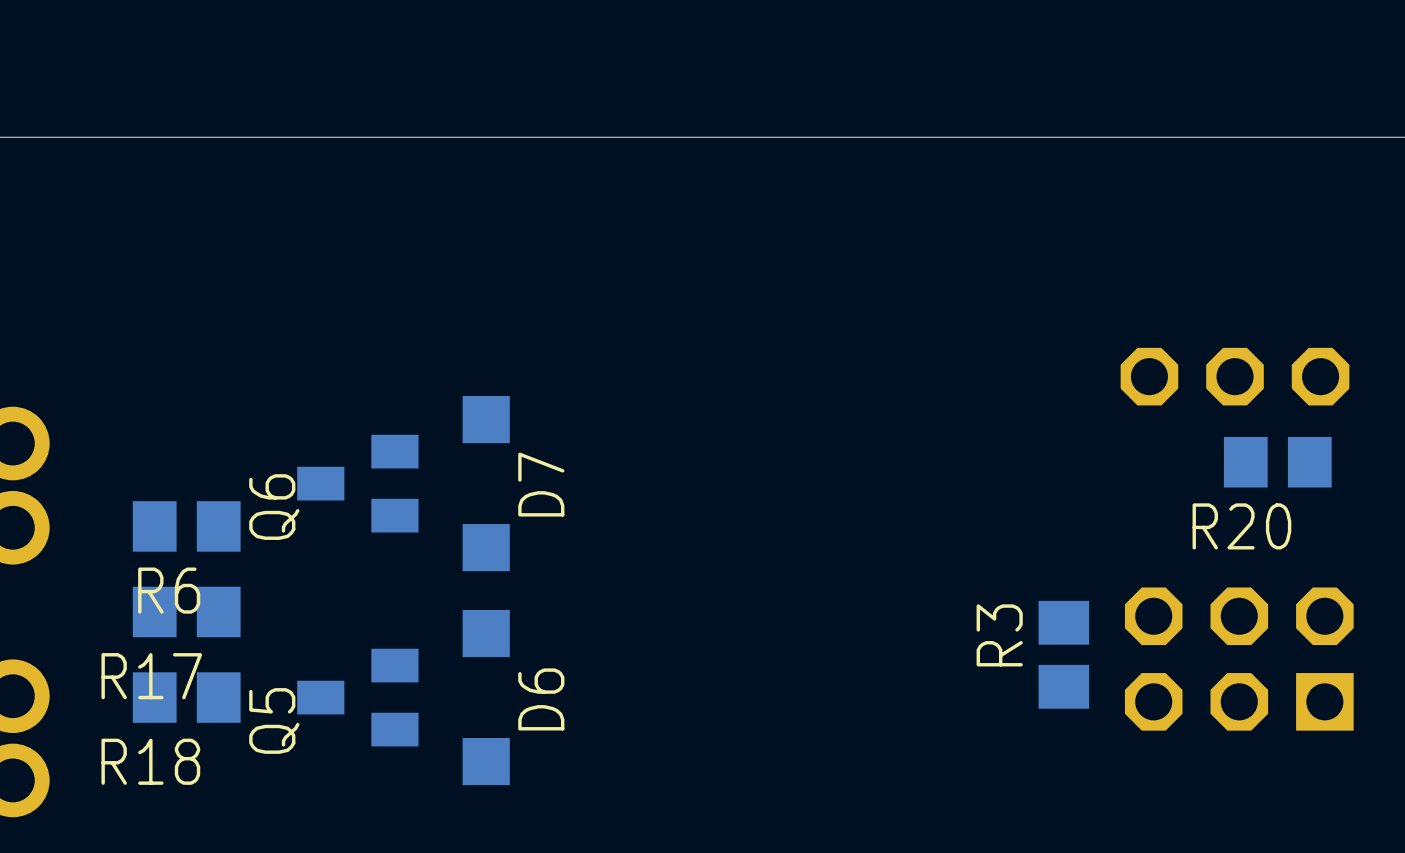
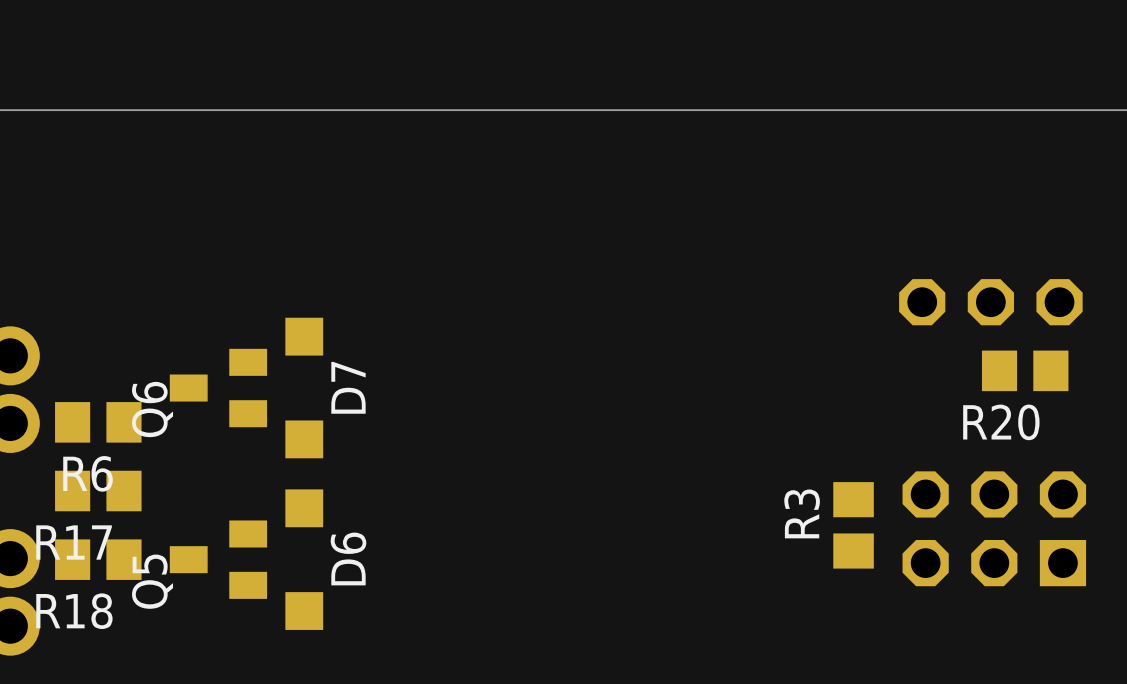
Q6 position: (357, 483) -> (218, 388)
D7 position: (486, 483) -> (304, 388)
R6 position: (186, 526) -> (98, 422)
R17 position: (186, 611) -> (98, 491)
R18 position: (186, 697) -> (98, 559)
Q5 position: (357, 697) -> (218, 559)
D6 position: (486, 697) -> (304, 559)

